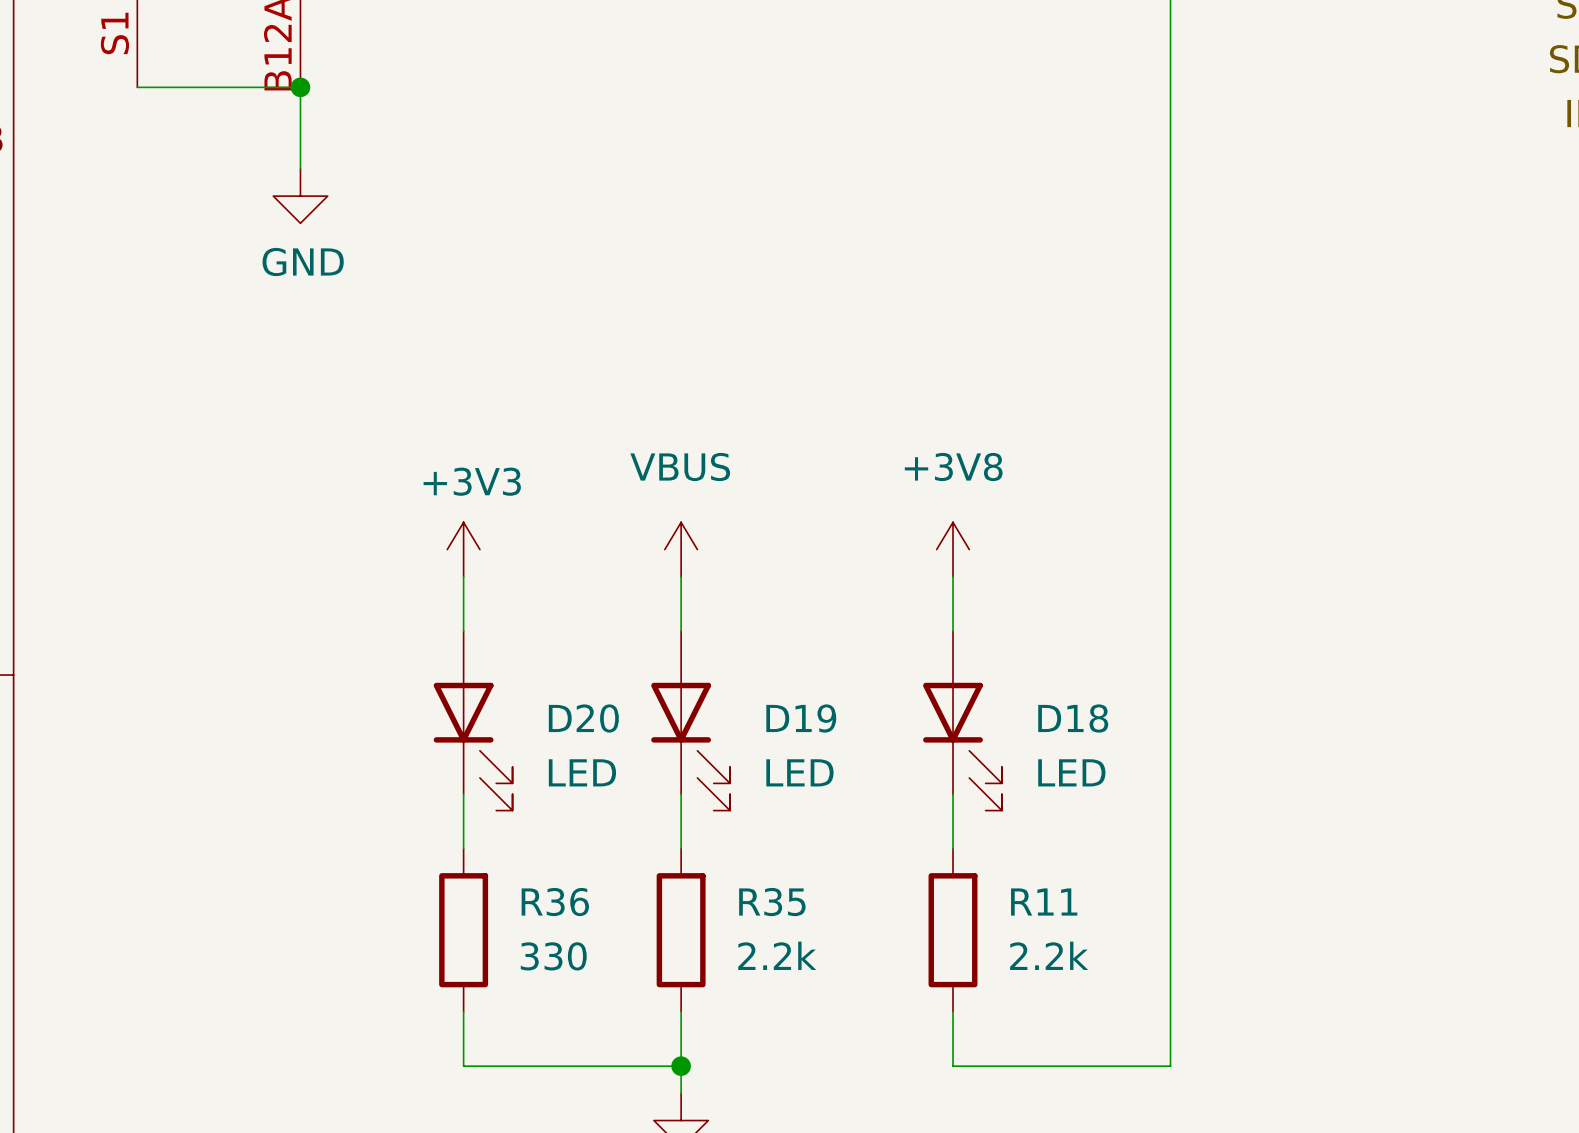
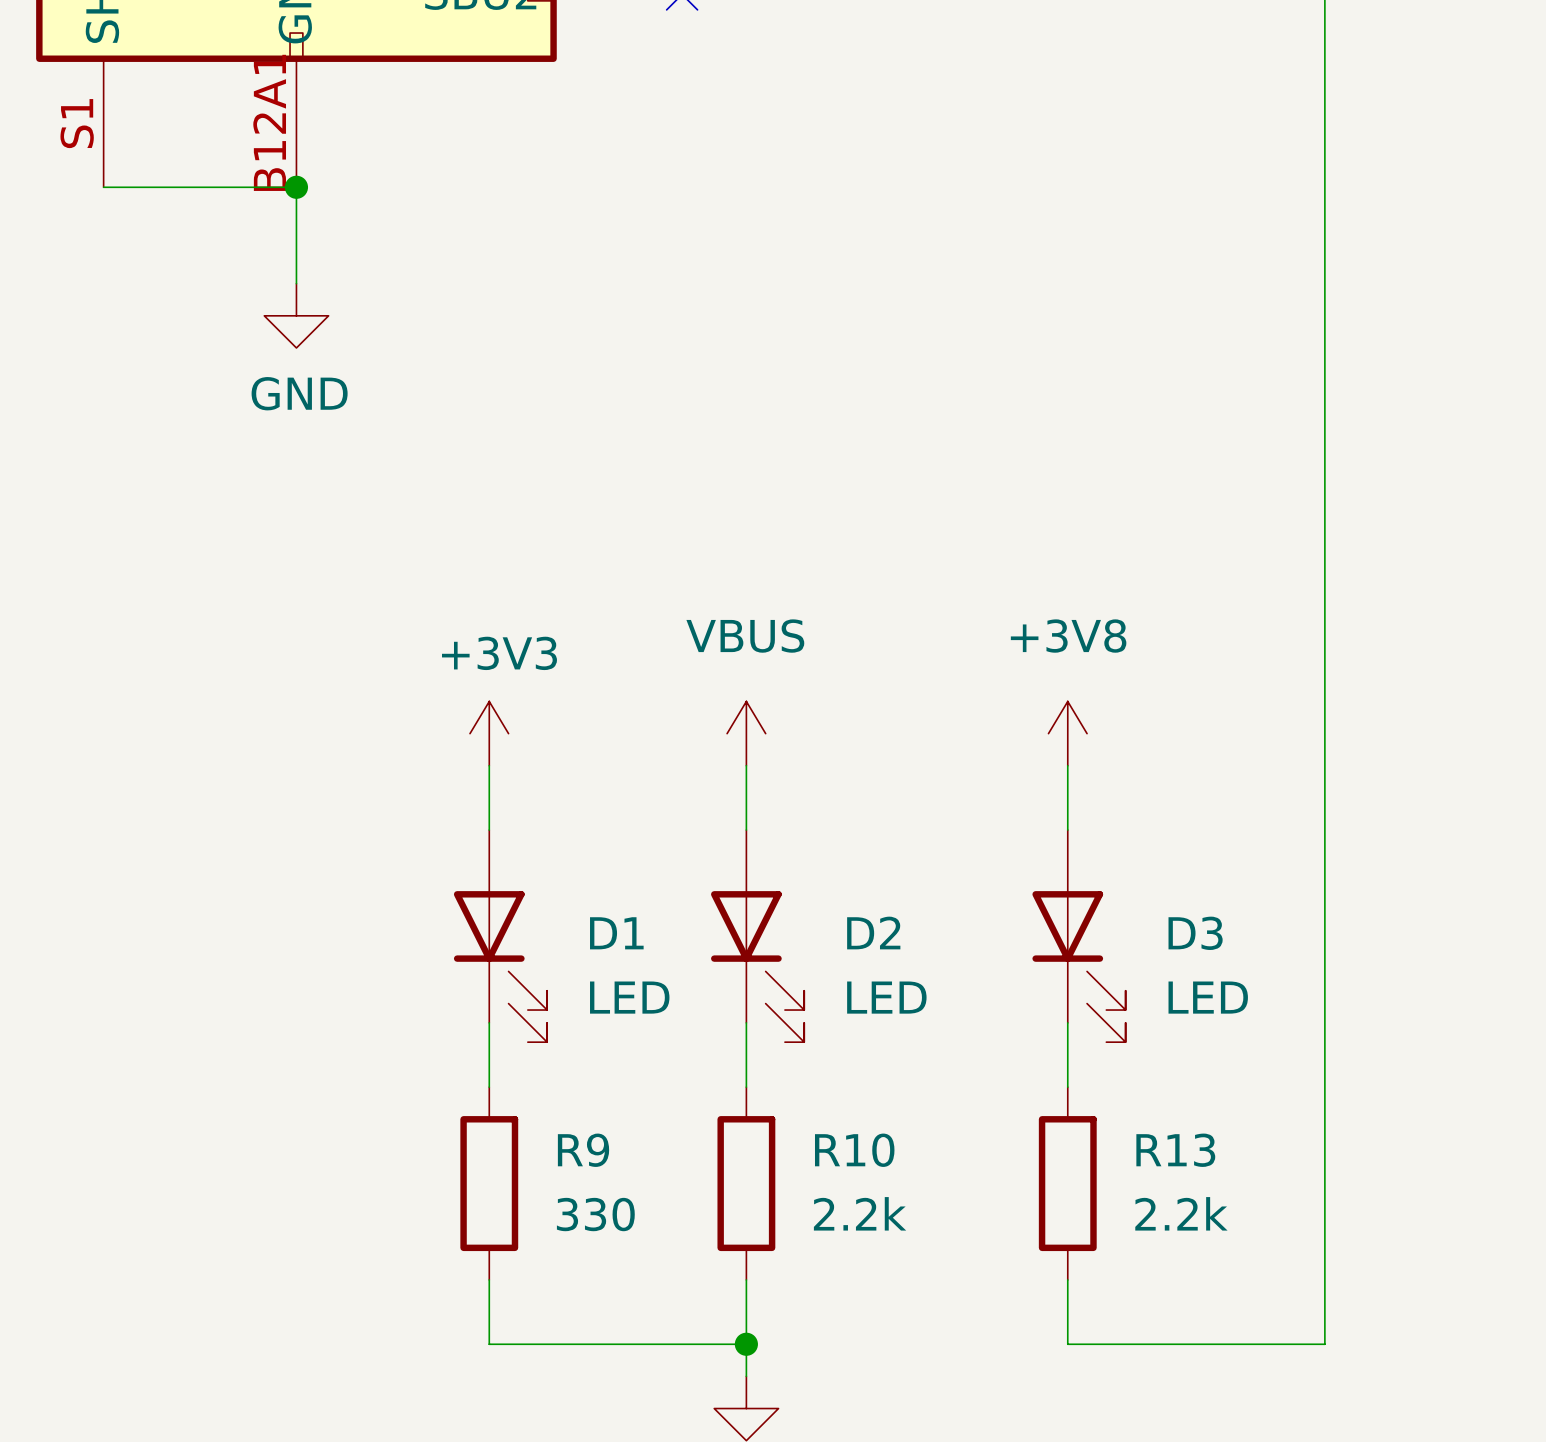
D20 name: D20 (583, 718) -> D1 (616, 933)
D19 name: D19 (801, 718) -> D2 (873, 933)
D18 name: D18 (1073, 718) -> D3 (1195, 933)
R36 name: R36 (555, 902) -> R9 (583, 1150)
R35 name: R35 (772, 902) -> R10 (854, 1150)
R11 name: R11 (1044, 902) -> R13 (1175, 1150)

